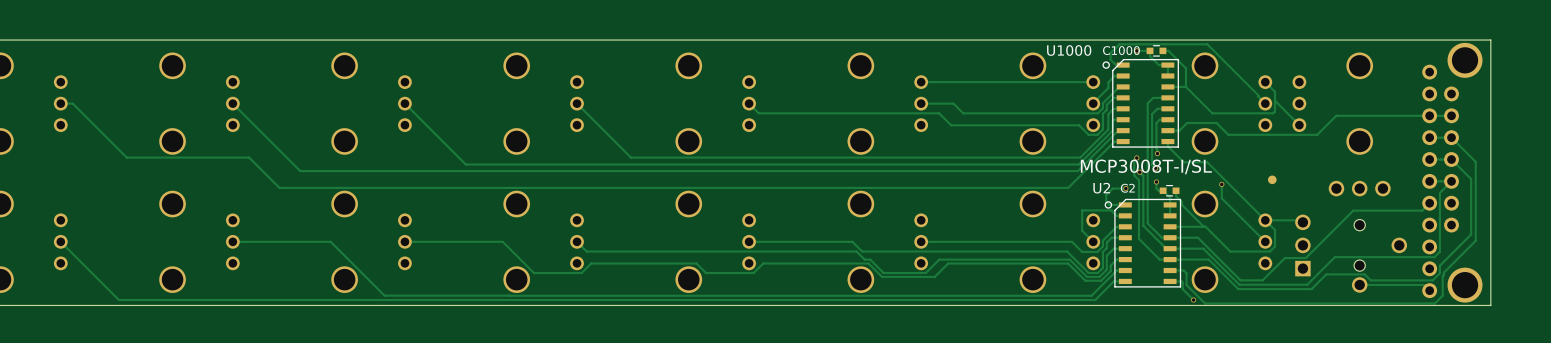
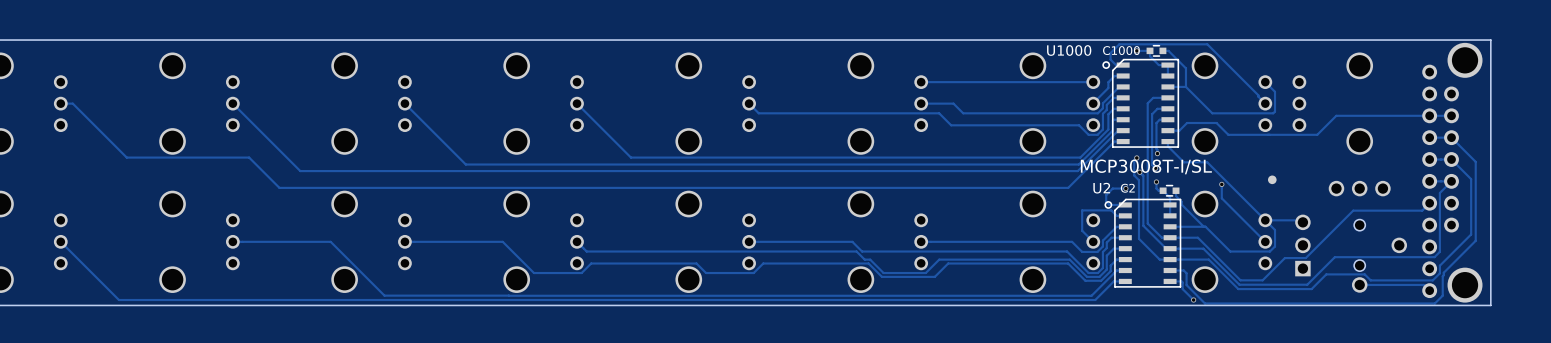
track: (1275, 100) (1299, 125) -> none

